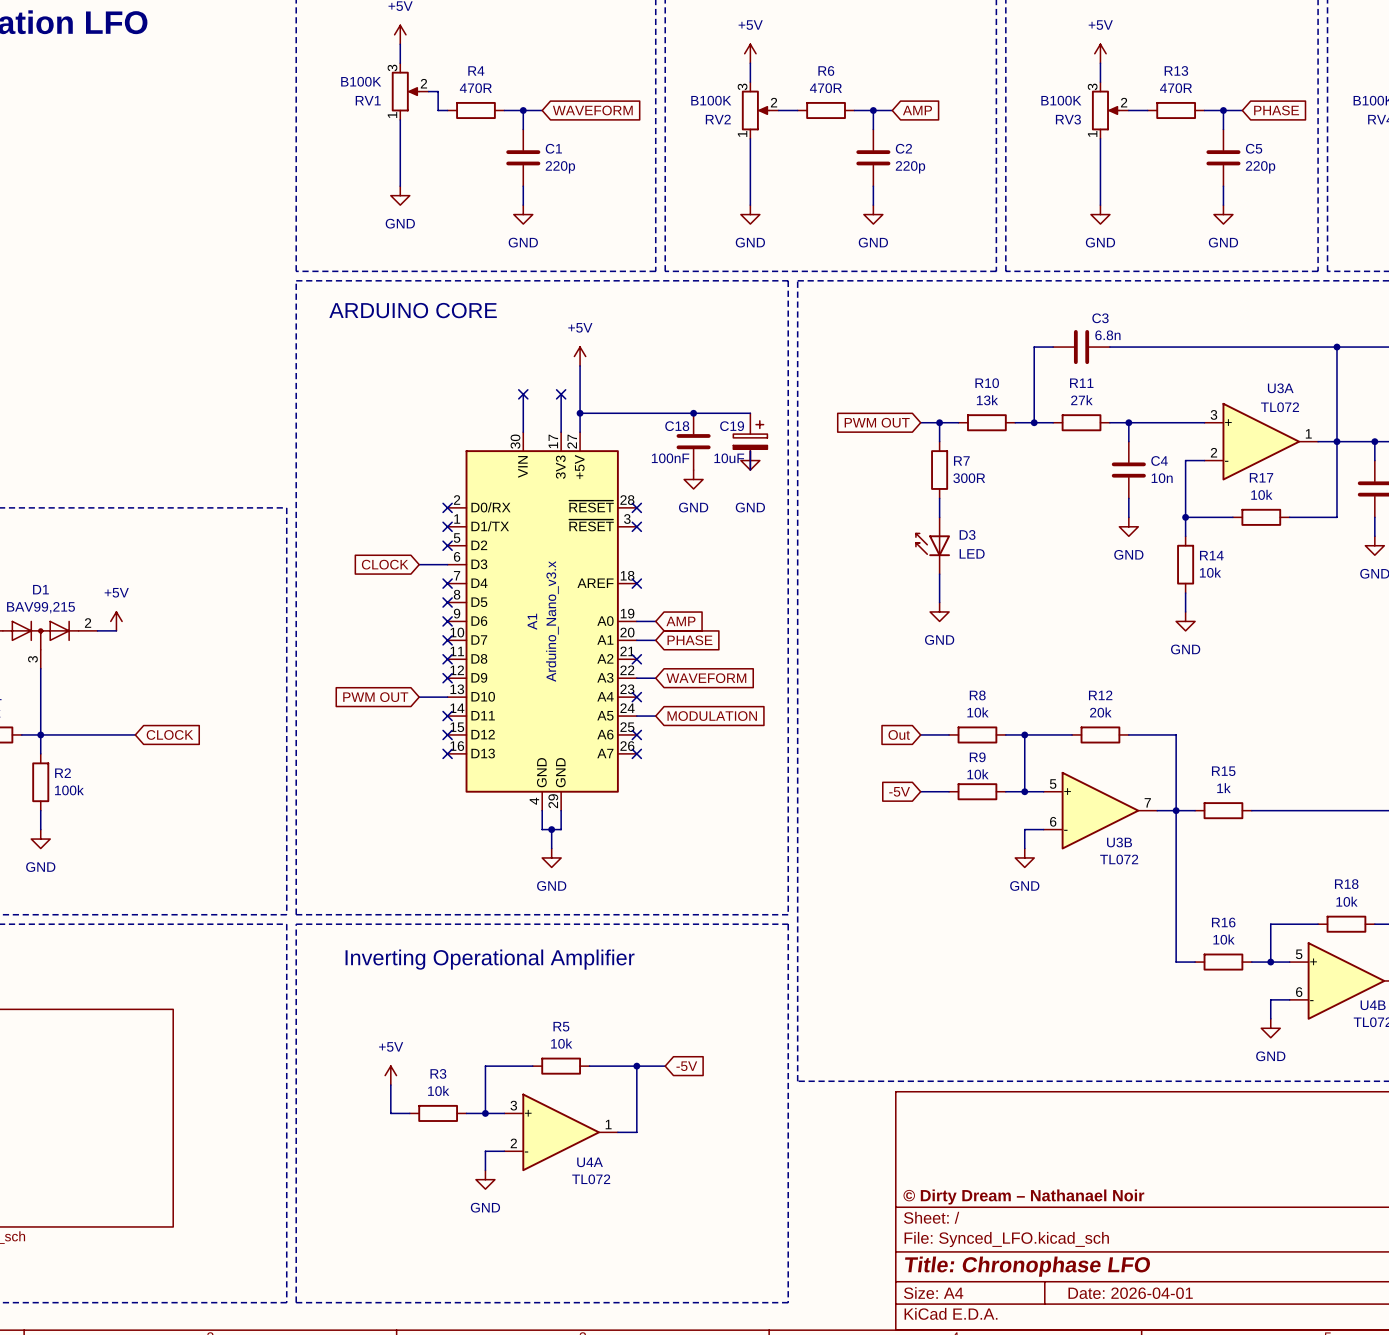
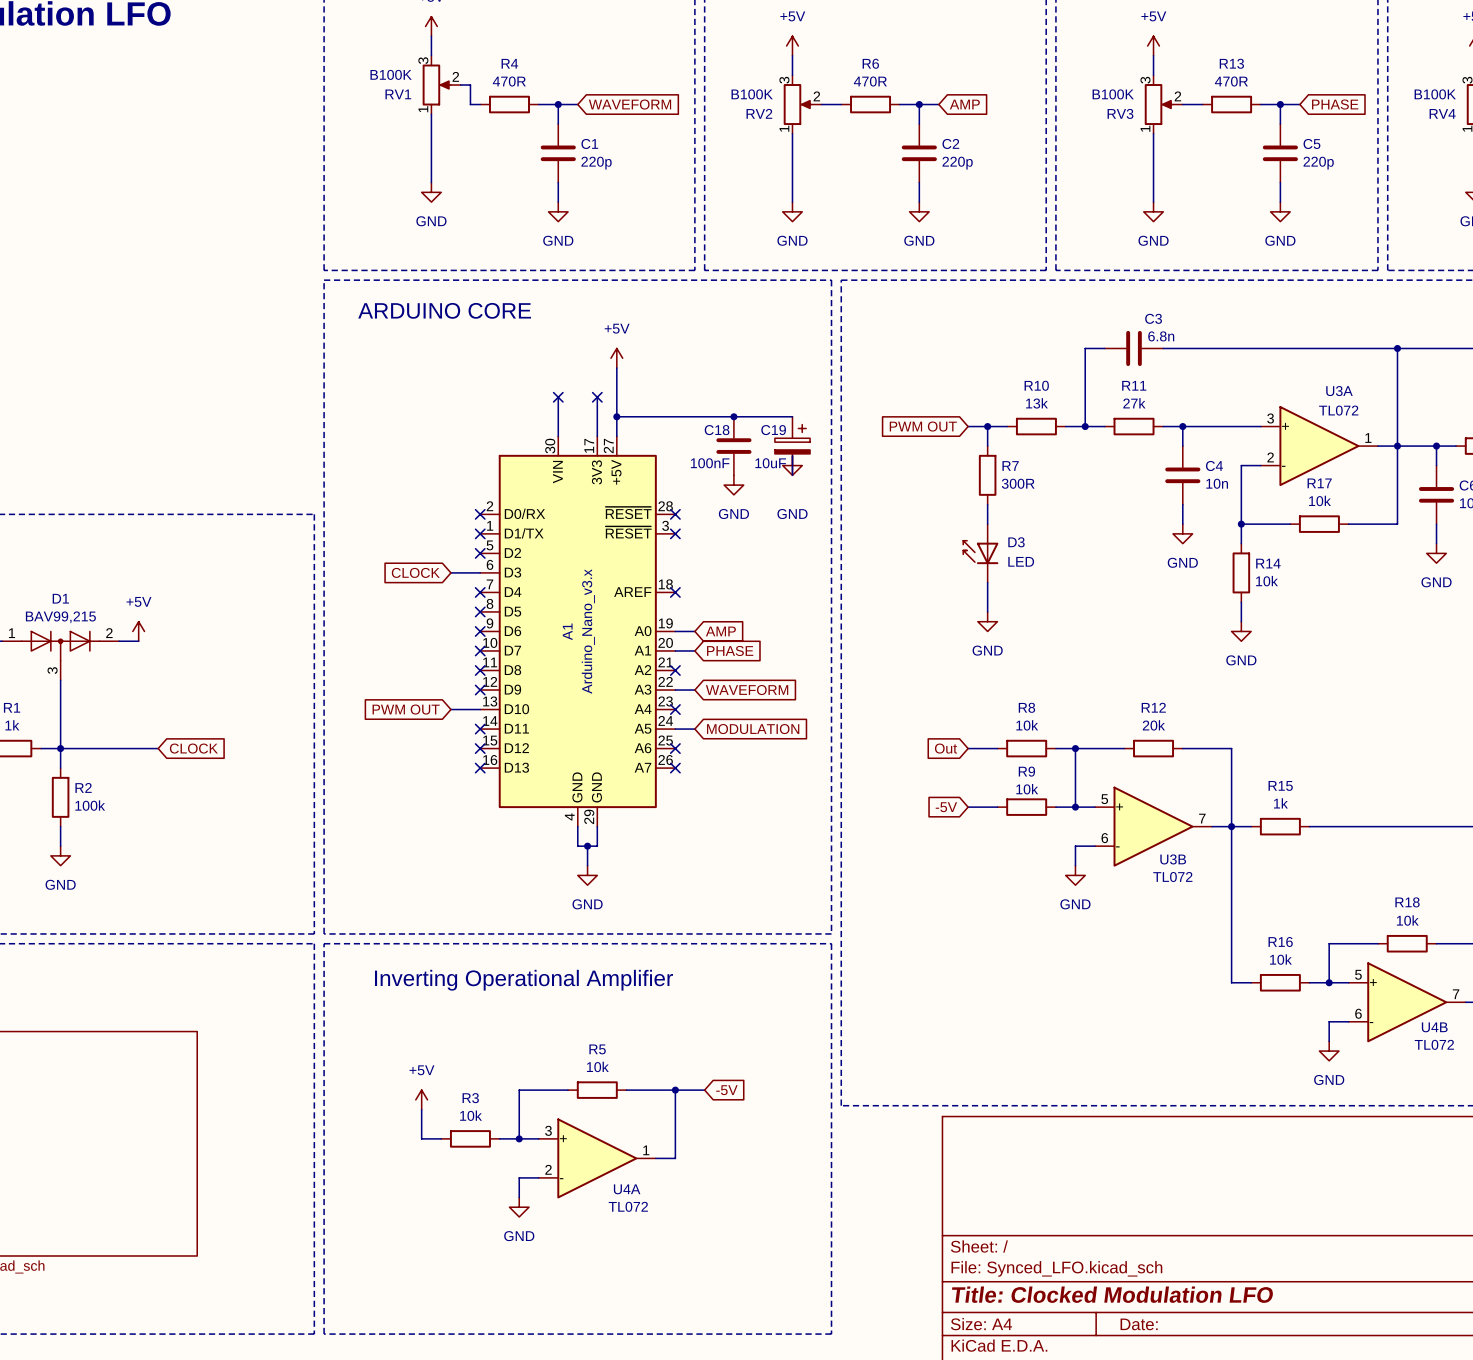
title block: © Dirty Dream – Nathanael Noir (1023, 1197) -> none
title block: Title: Chronophase LFO (1027, 1266) -> Title: Clocked Modulation LFO (1112, 1294)
title block: Date: 2026-04-01 (1130, 1293) -> Date: (1139, 1324)

